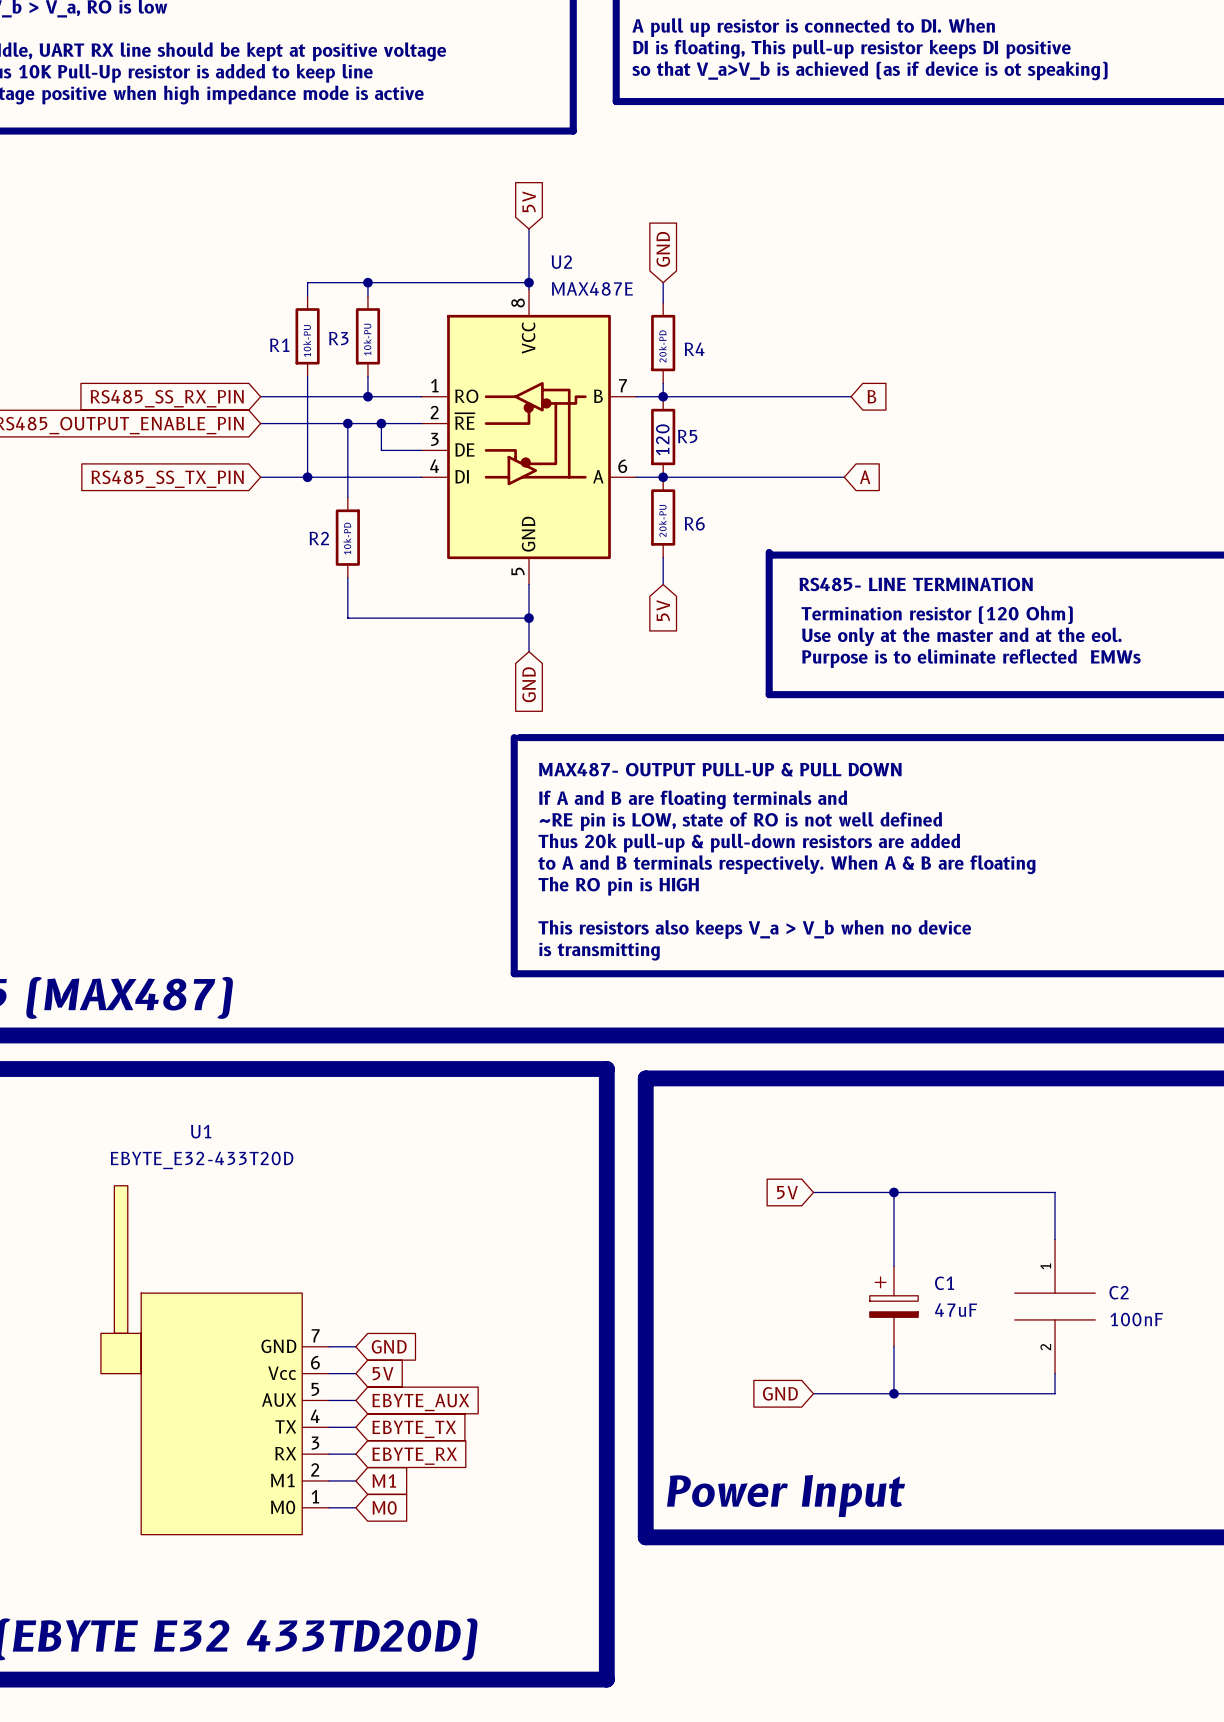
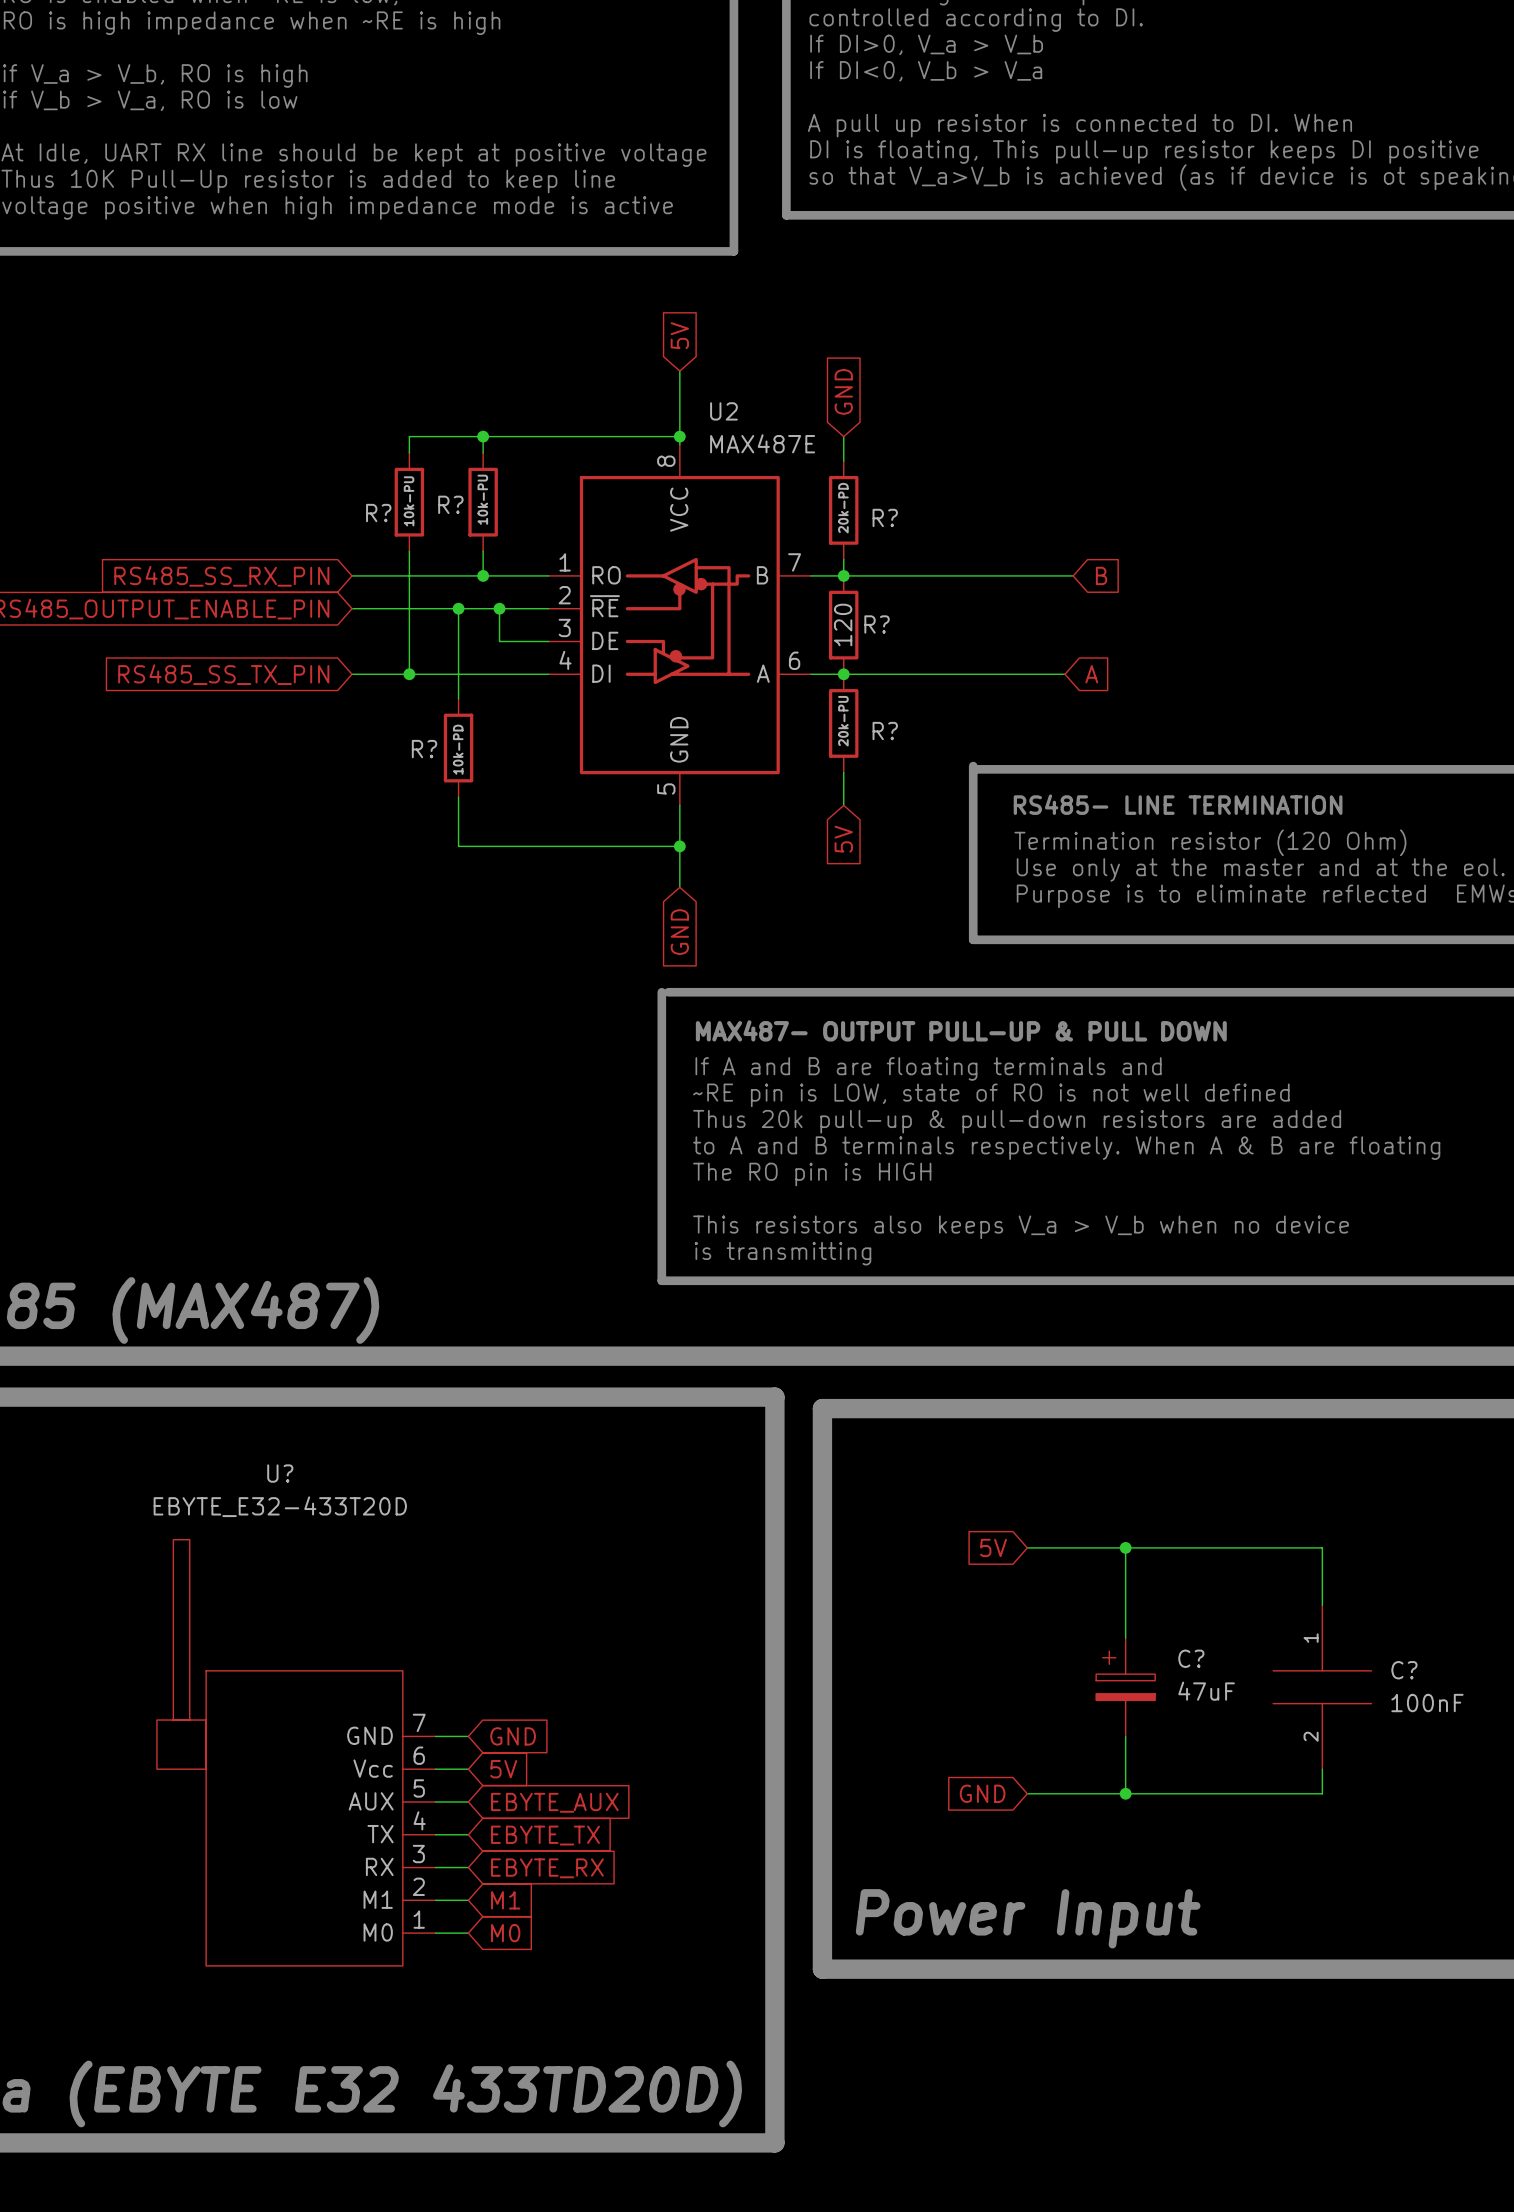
R3 name: R3 (338, 338) -> R? (450, 504)
R1 name: R1 (279, 345) -> R? (378, 513)
R4 name: R4 (694, 349) -> R? (885, 517)
R5 name: R5 (687, 436) -> R? (877, 624)
R6 name: R6 (694, 523) -> R? (885, 731)
R2 name: R2 (319, 538) -> R? (424, 749)
U1 name: U1 (201, 1131) -> U? (280, 1473)
C1 name: C1 (944, 1283) -> C? (1191, 1658)
C2 name: C2 (1119, 1292) -> C? (1404, 1670)

